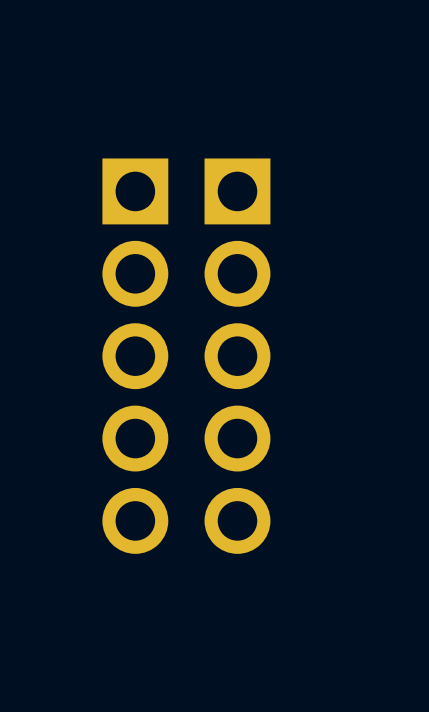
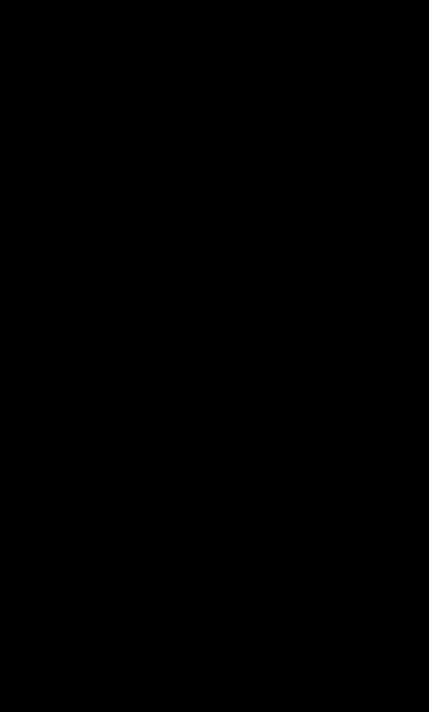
part: (186, 356) -> none

